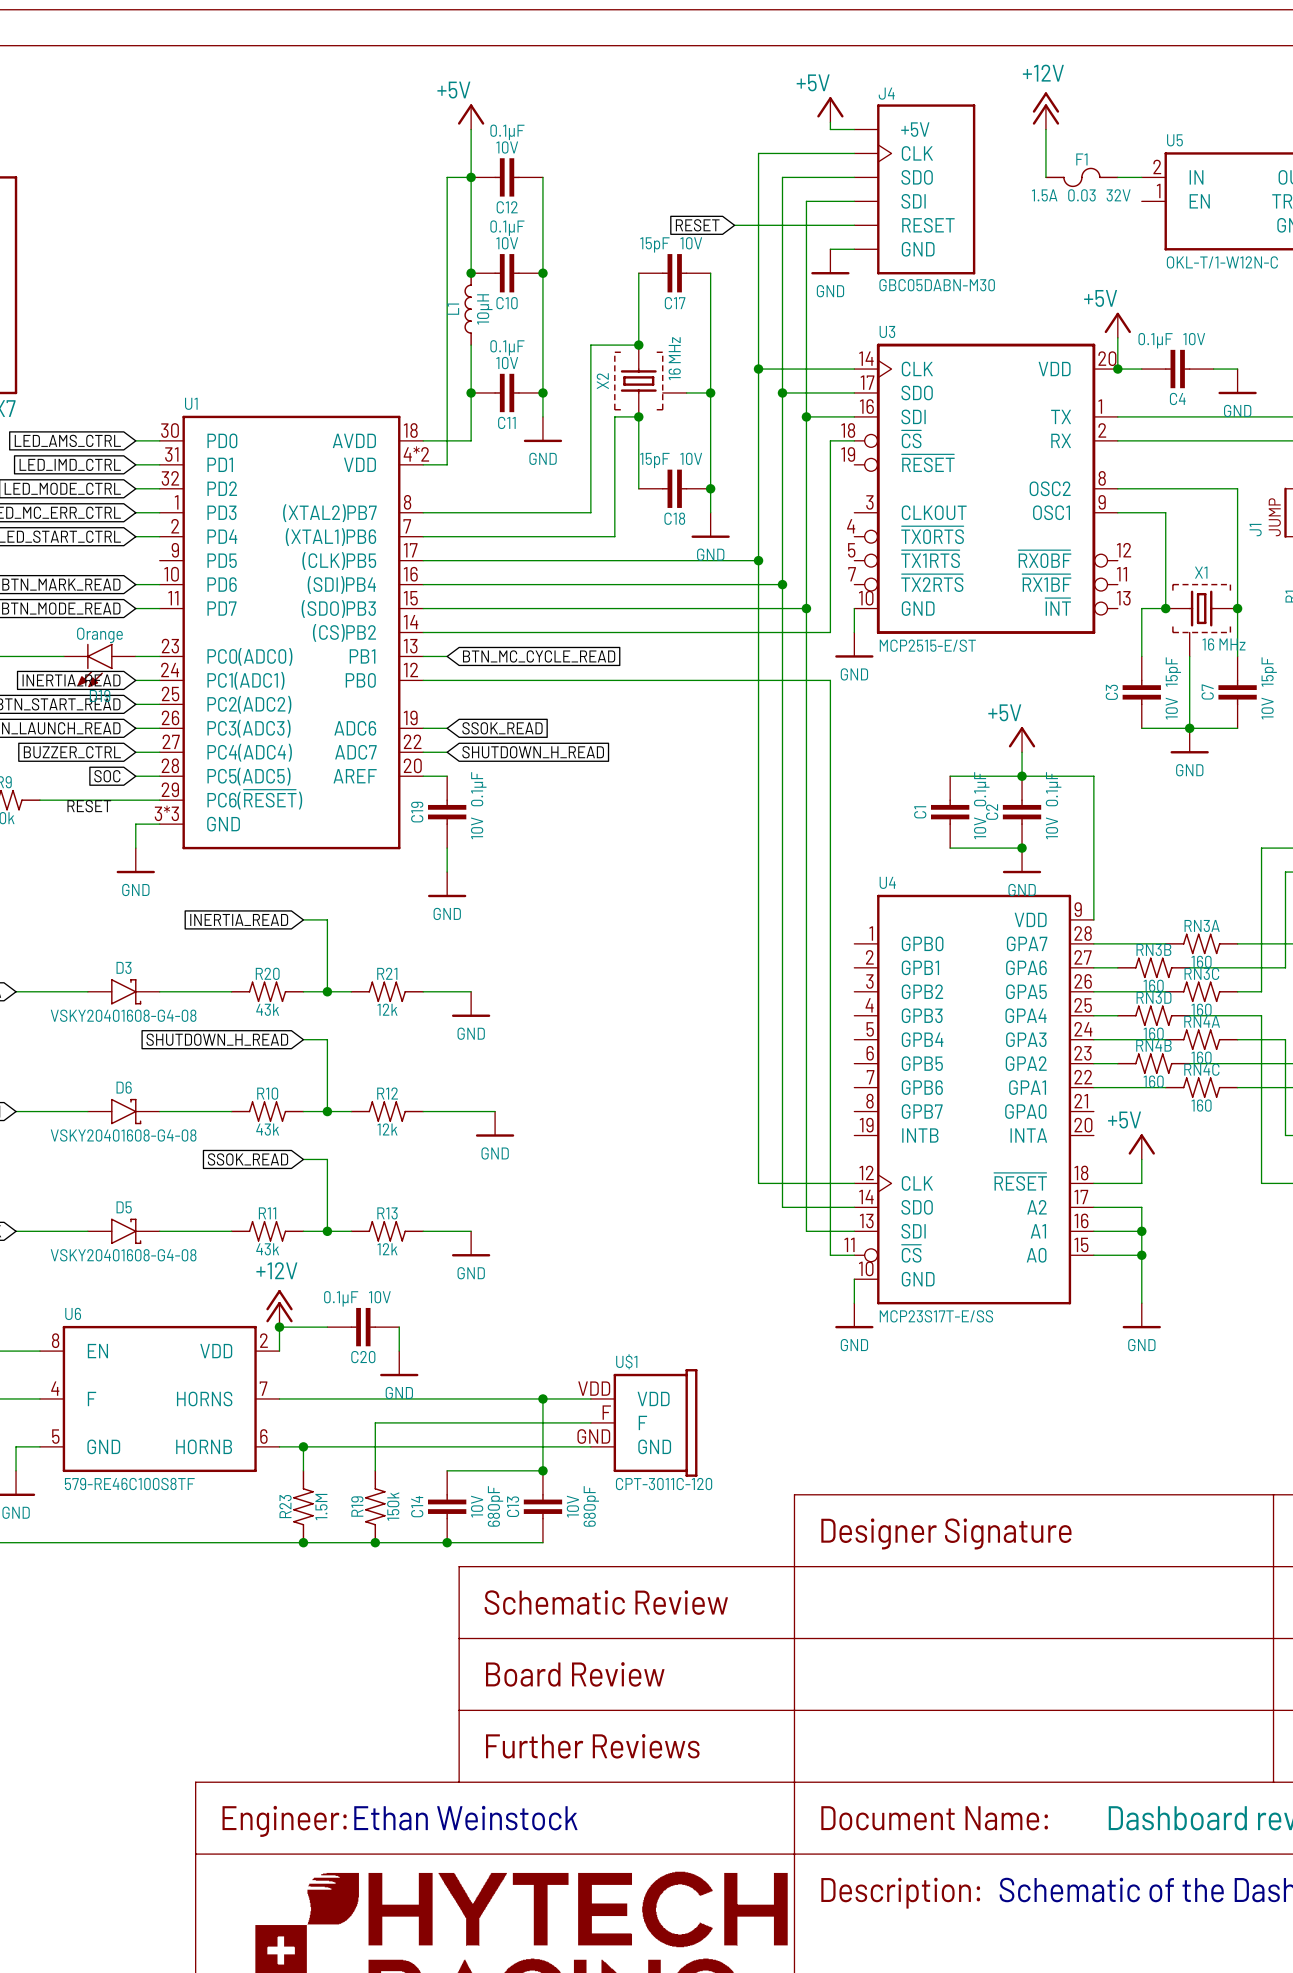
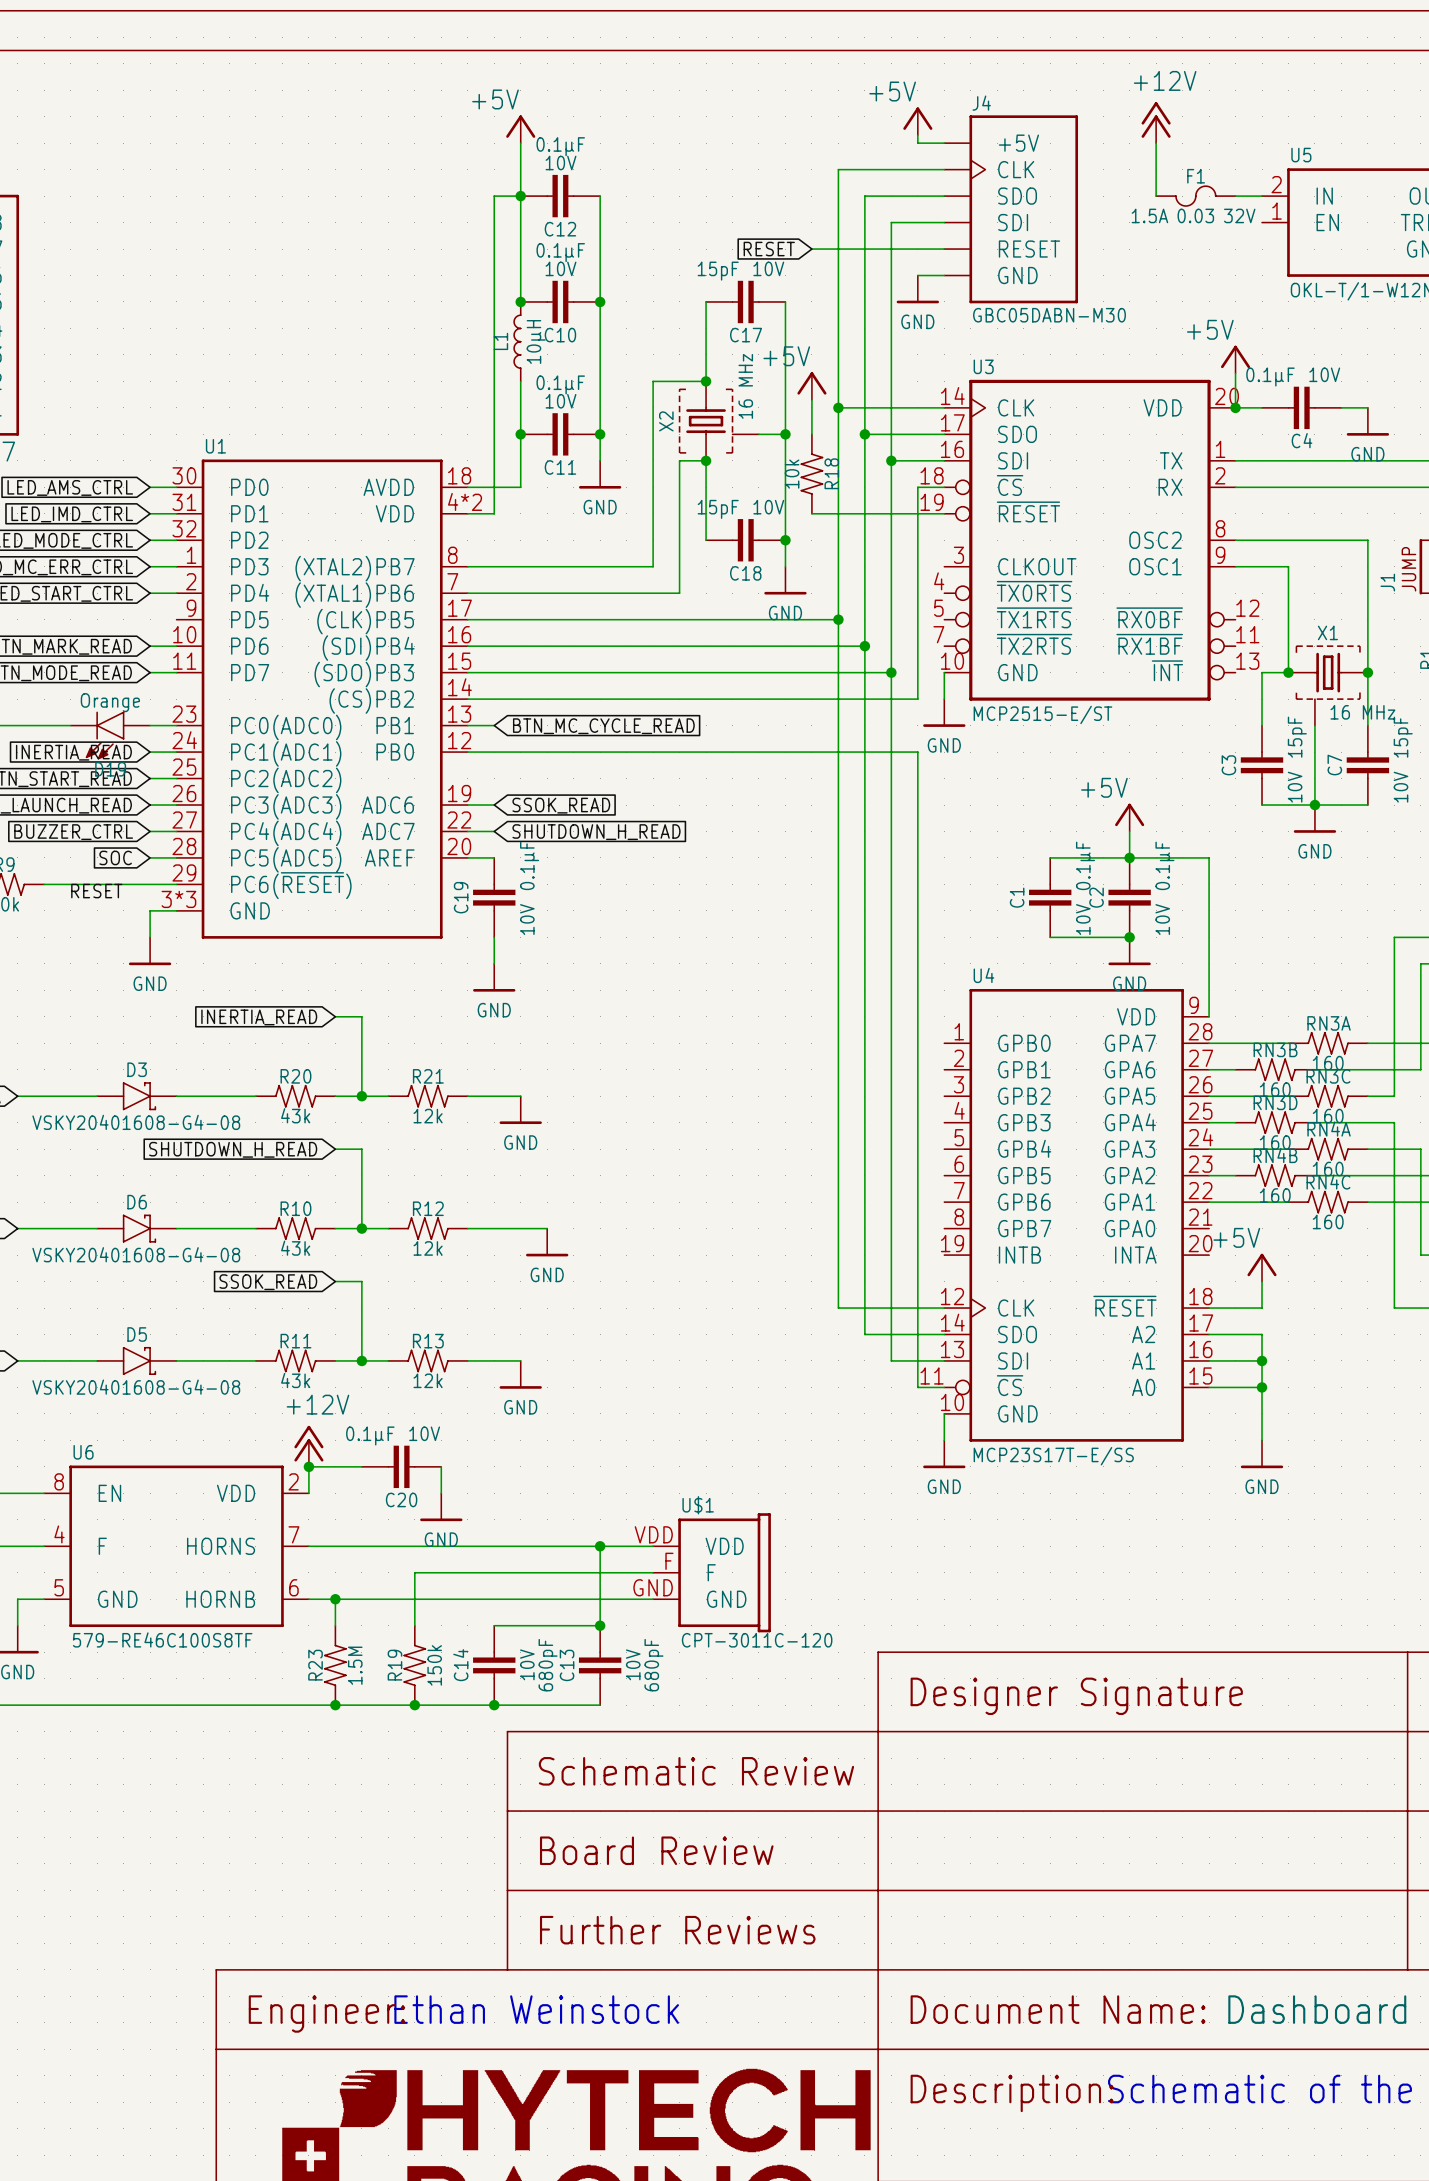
power symbol: none -> +5V (811, 386)
wire: none -> (811, 399) (811, 434)
R18: none -> (811, 474)
wire: none -> (811, 513) (944, 513)

